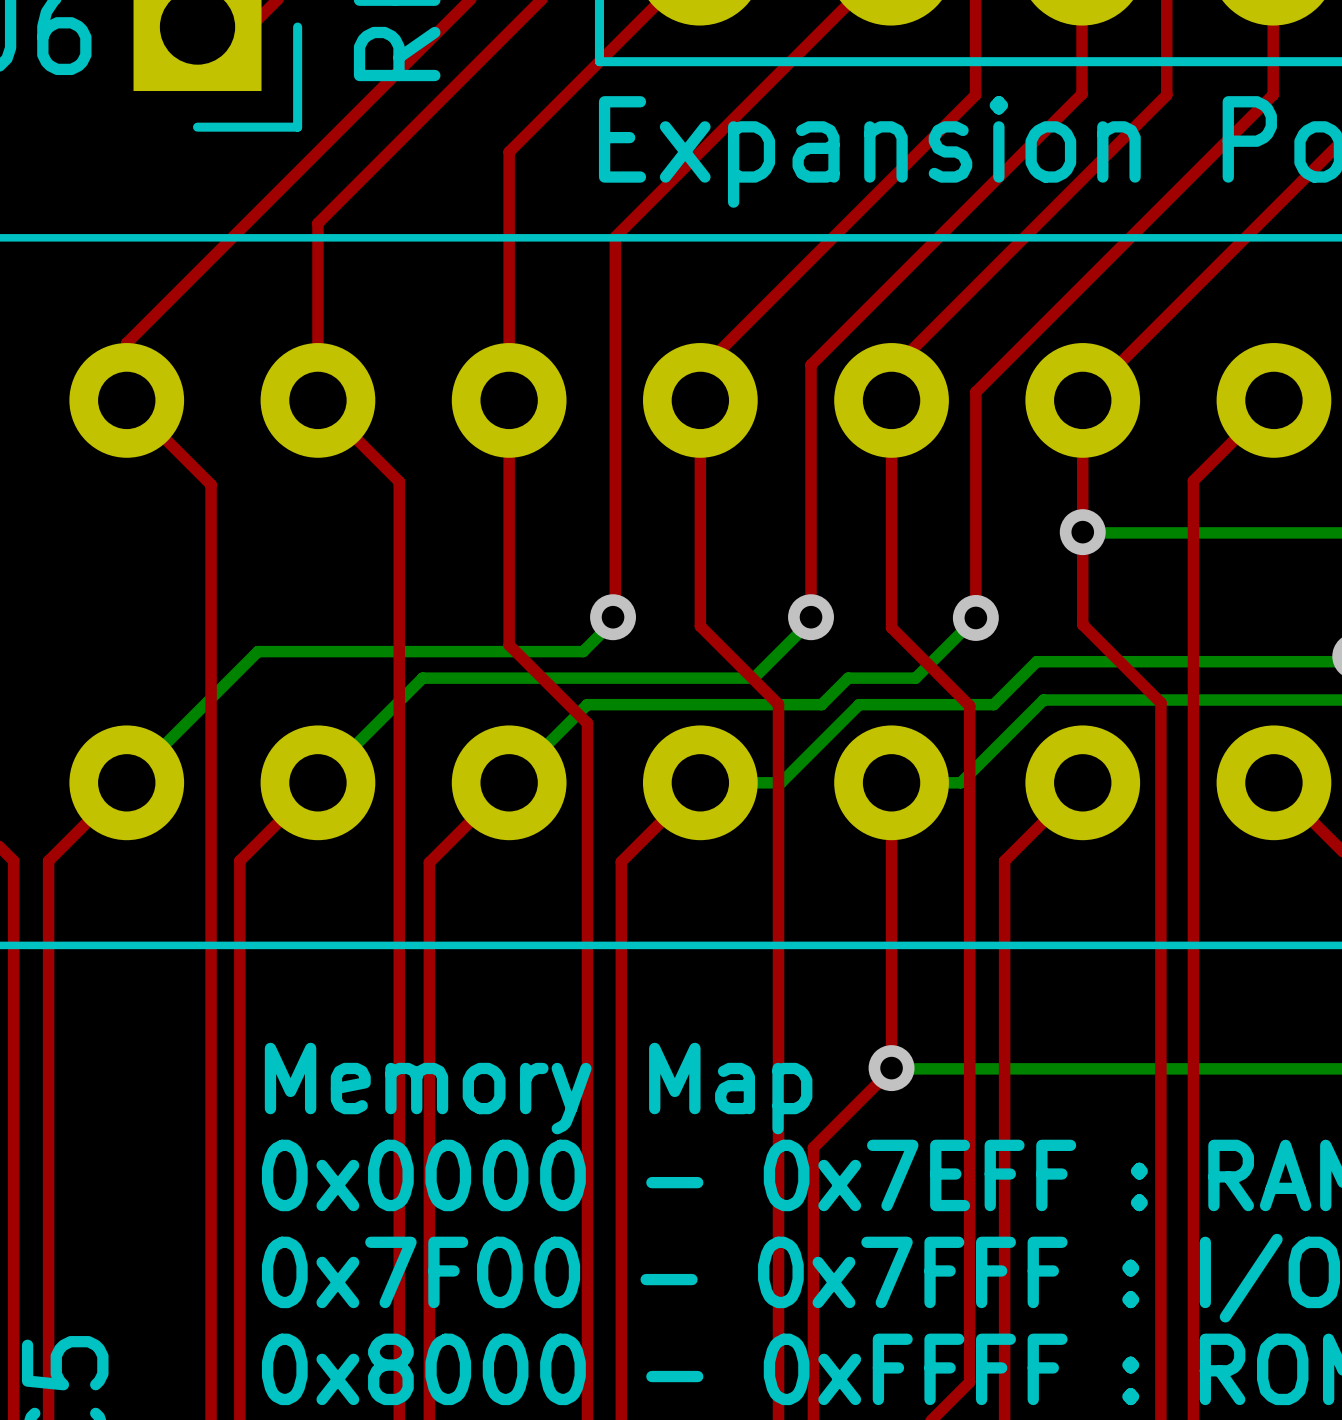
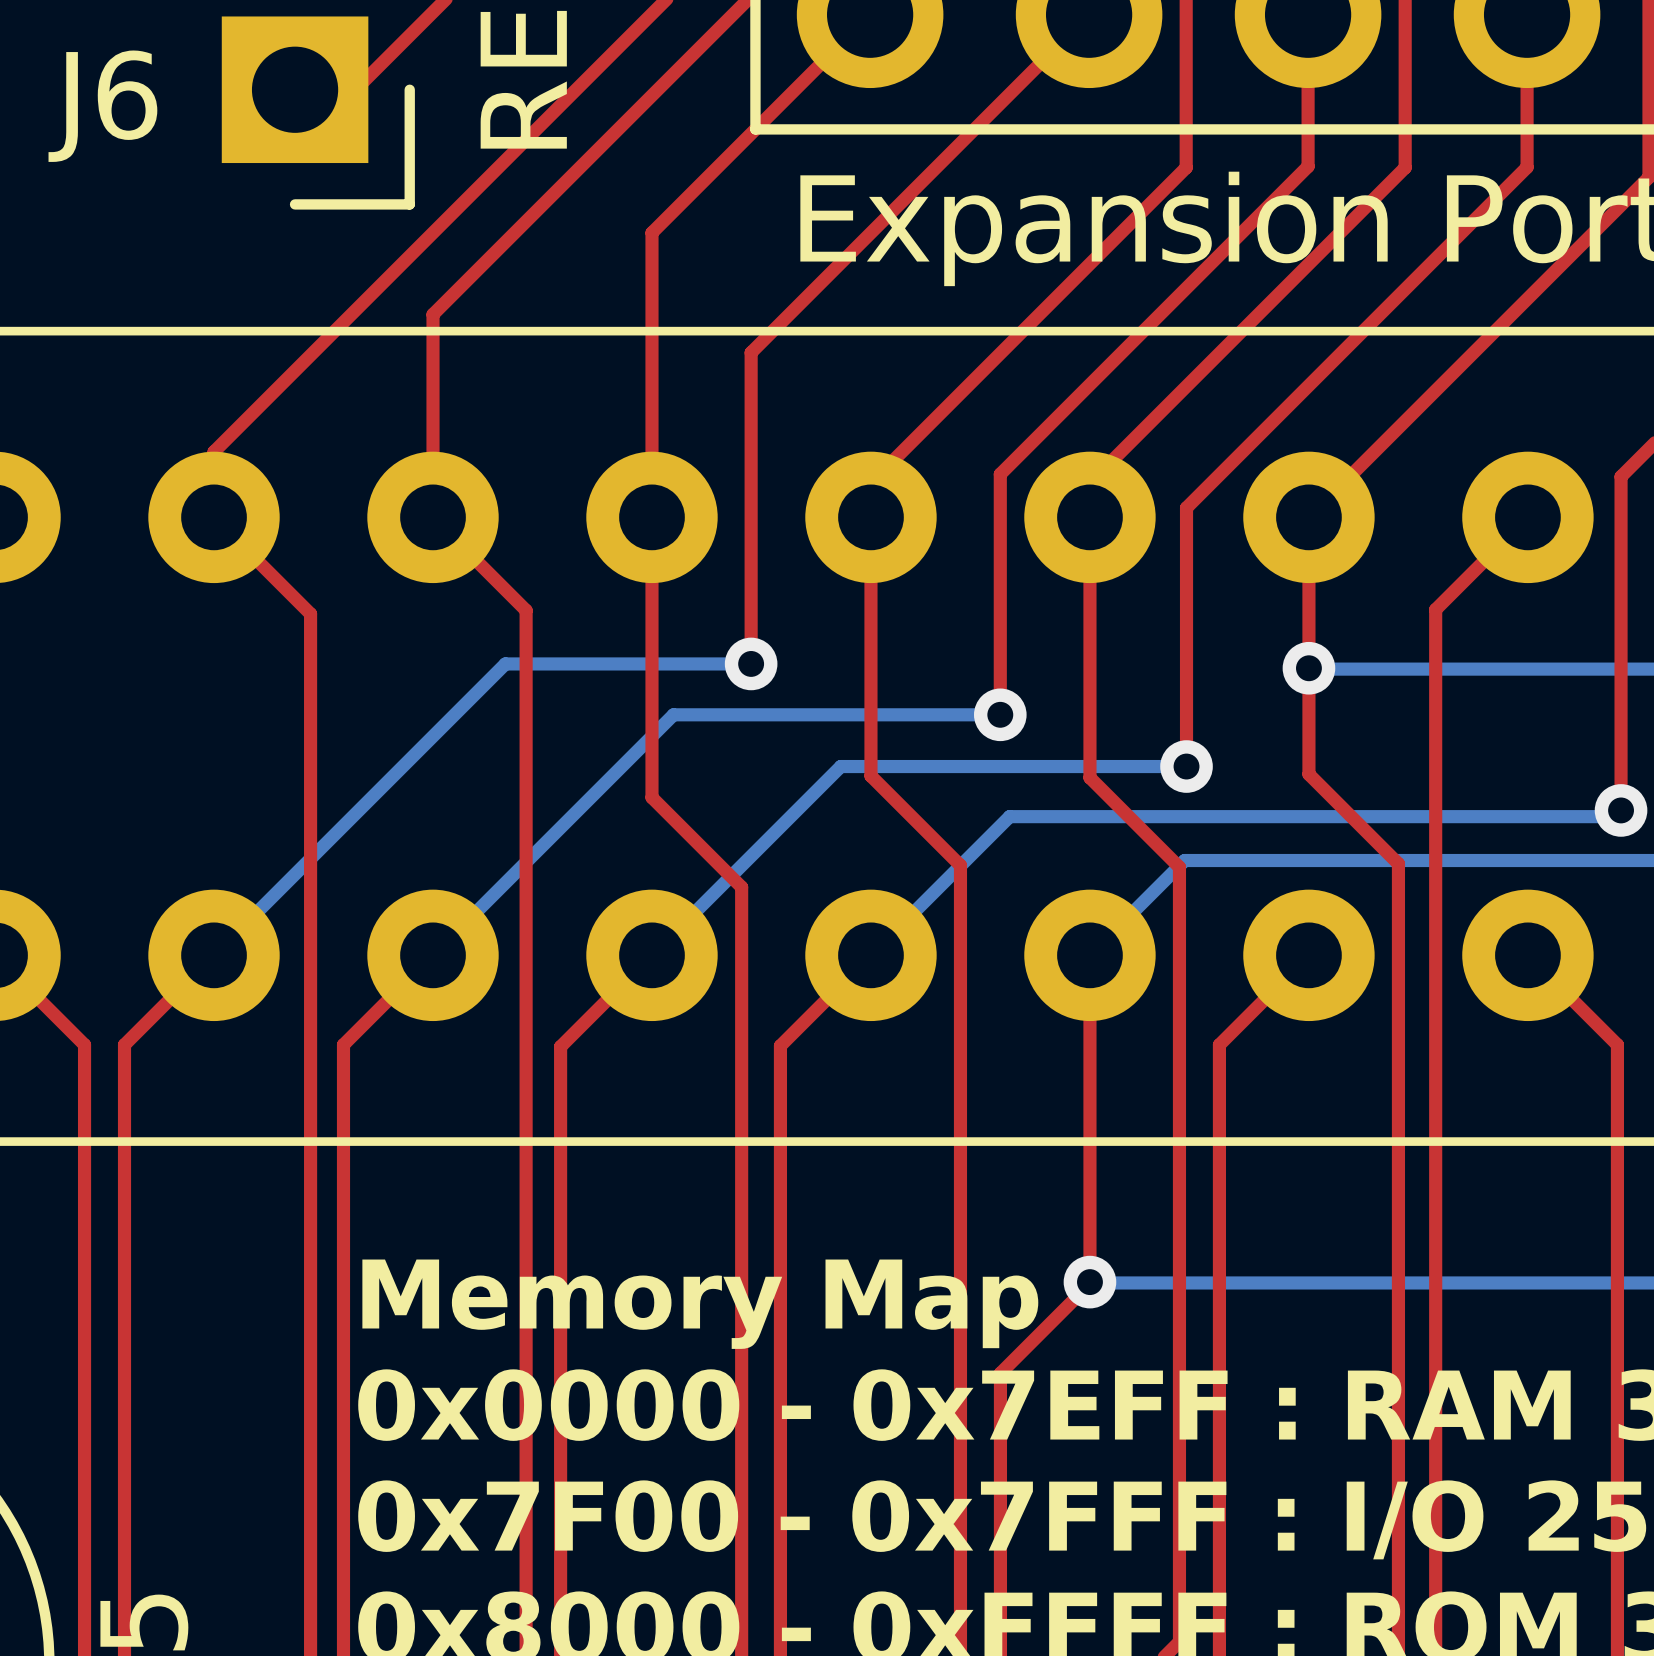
top track: (615, 237) (615, 614) (613, 617) -> (773, 330) (751, 352) (751, 663)
top track: (813, 362) (811, 365) (811, 617) -> (1000, 474) (1000, 714)
bottom track: (613, 617) (613, 621) (583, 651) (257, 651) -> (751, 663) (505, 663) (364, 805)
via position: (613, 617) -> (751, 663)
bottom track: (811, 617) (811, 620) (753, 678) (422, 678) -> (1000, 714) (673, 714) (552, 835)
via position: (811, 617) -> (1000, 714)
bottom track: (975, 617) (915, 678) (848, 678) (821, 704) (587, 704) -> (1186, 766) (840, 766) (741, 865)
bottom track: (1036, 661) (993, 704) (859, 704) (781, 782) (700, 782) -> (1256, 816) (1009, 816) (870, 955)
bottom track: (1043, 700) (960, 782) (891, 782) -> (1264, 860) (1184, 860) (1089, 955)

